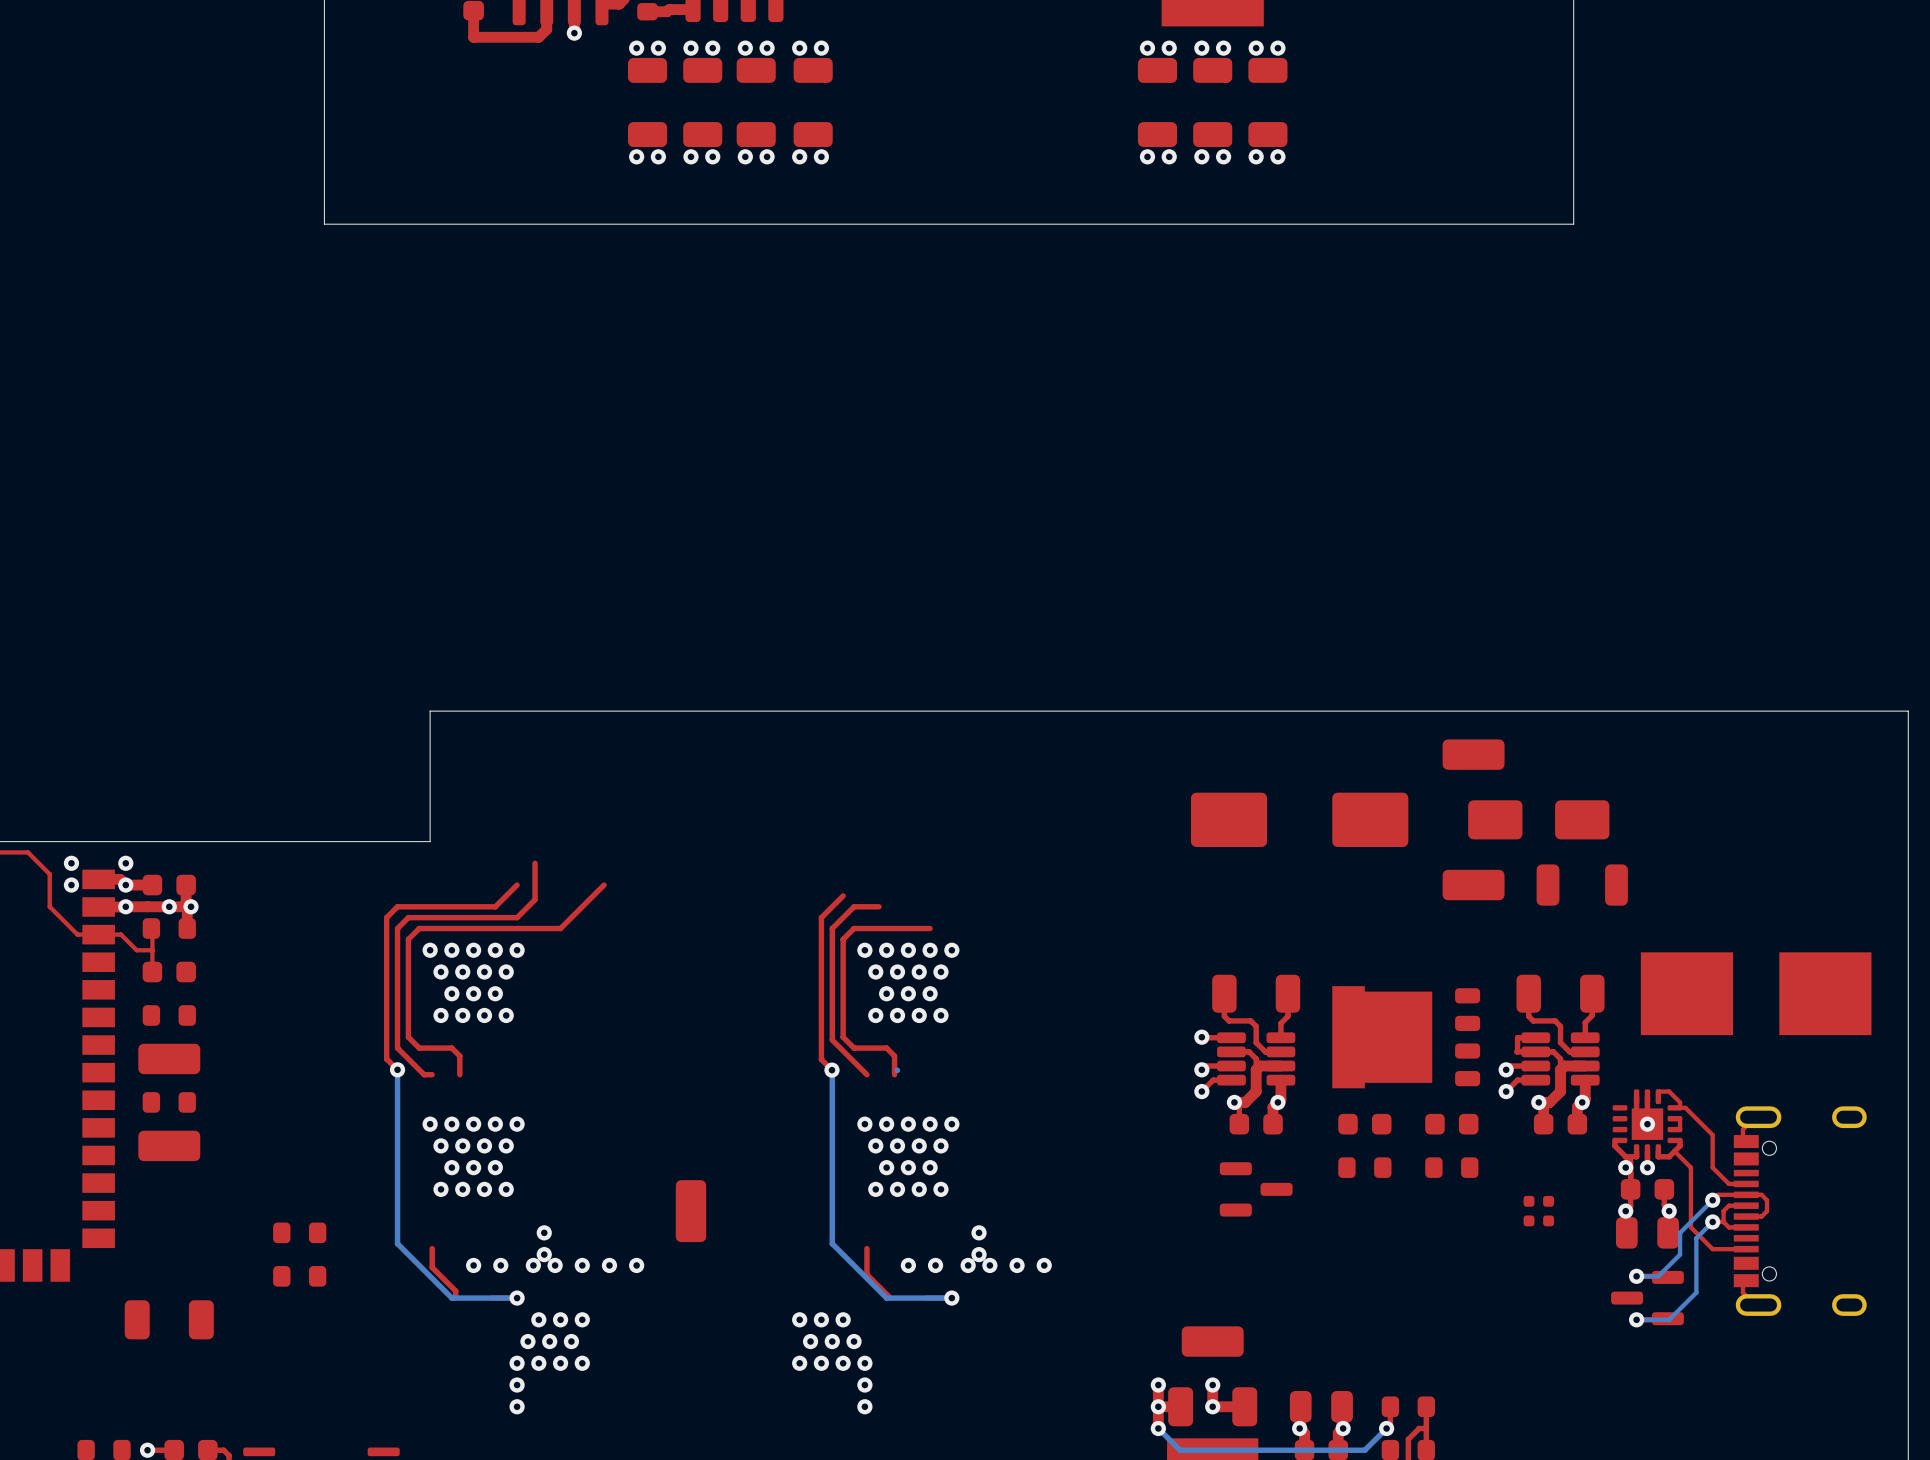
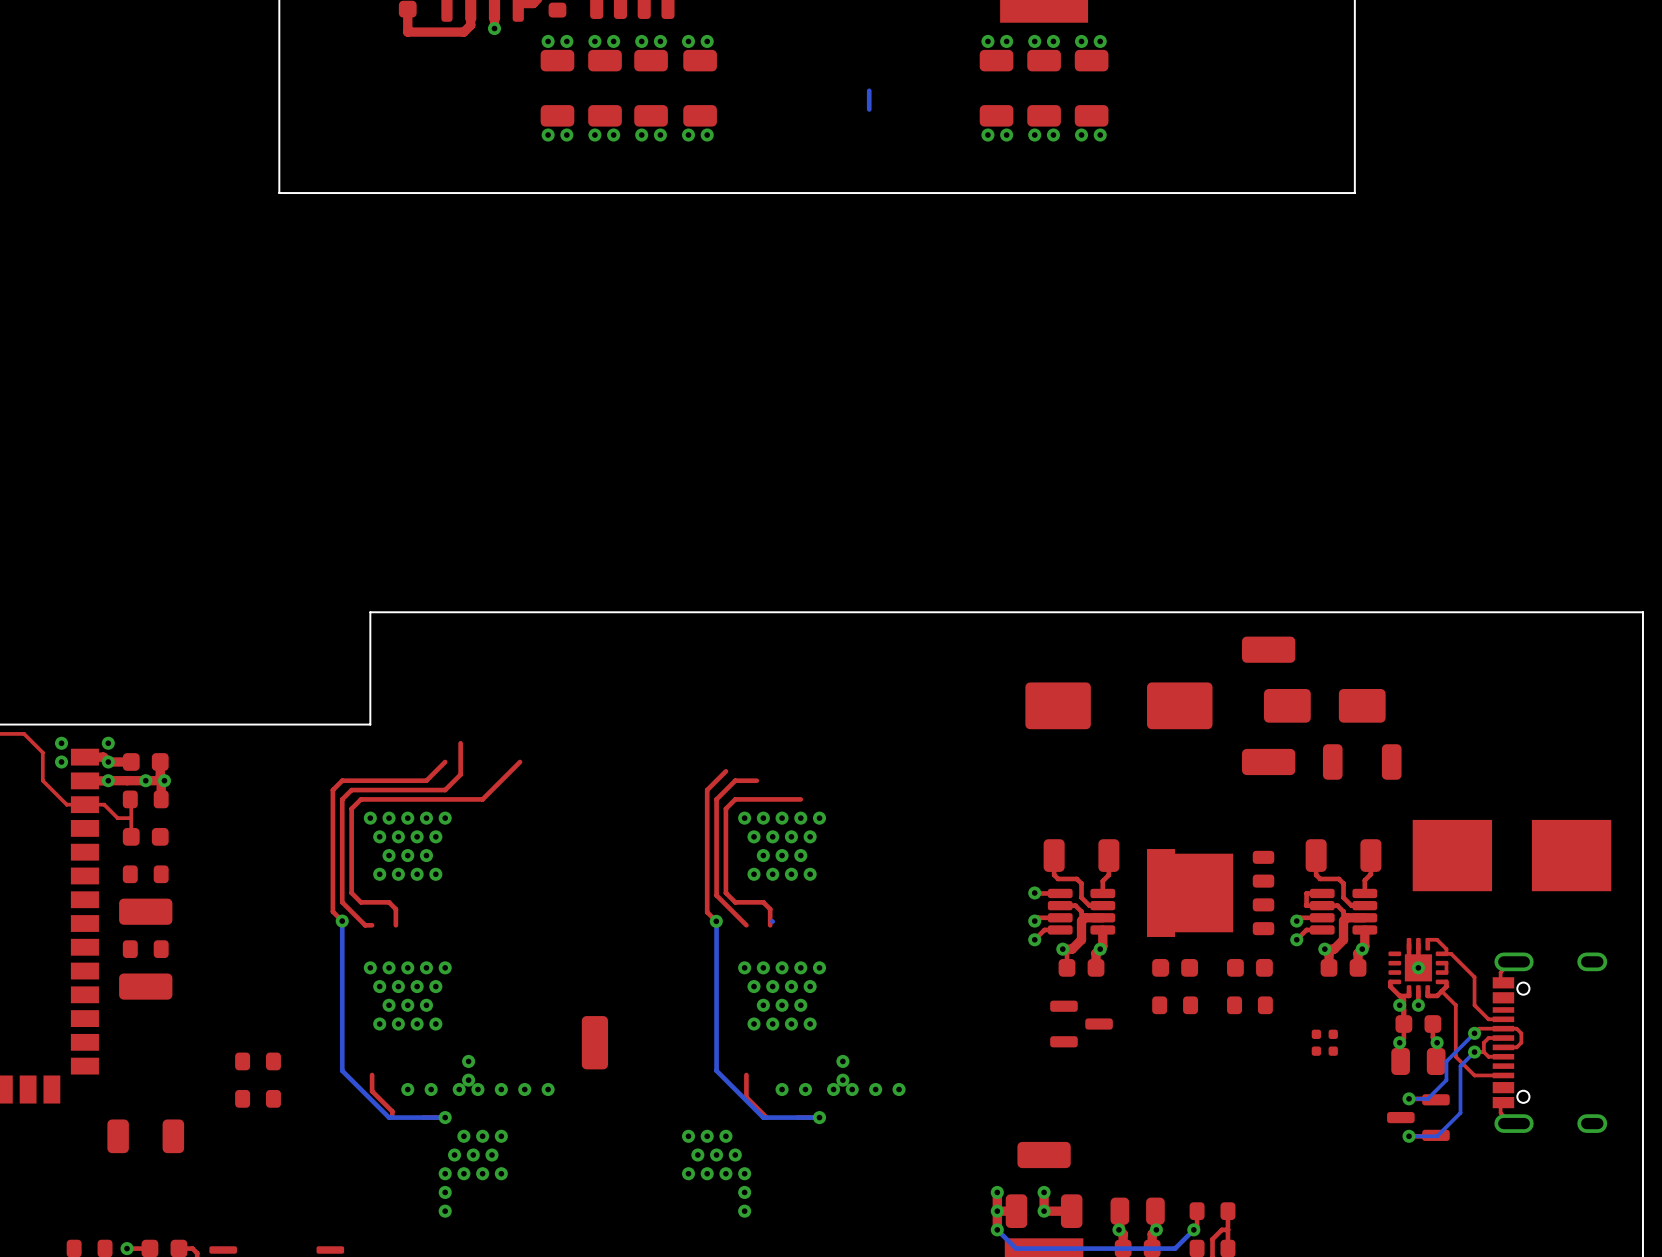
top track: (693, 9) (647, 11) -> none
bottom track: none -> (869, 90) (869, 109)

